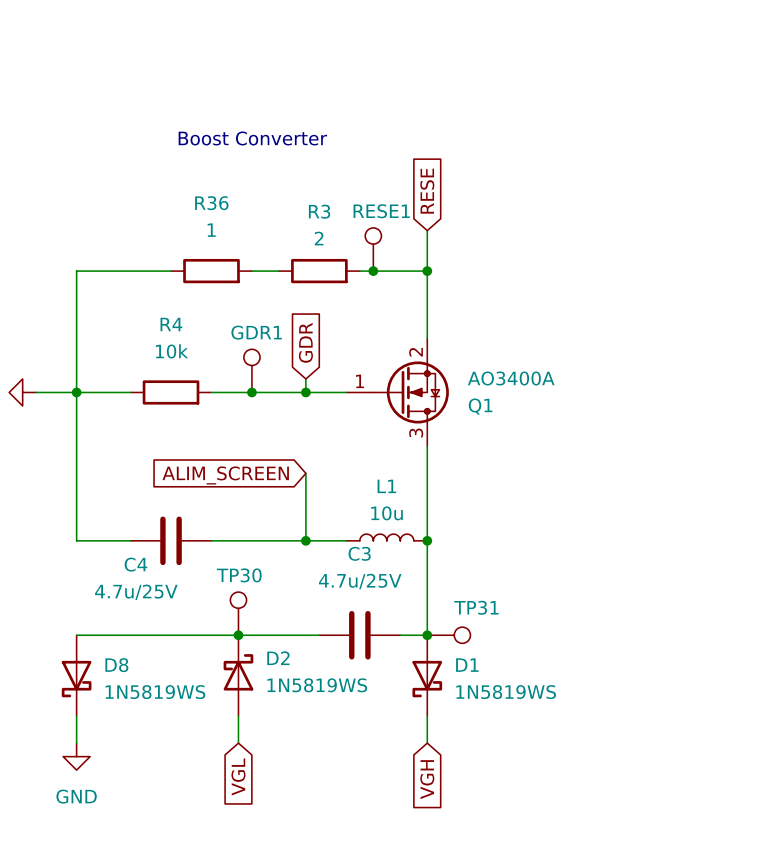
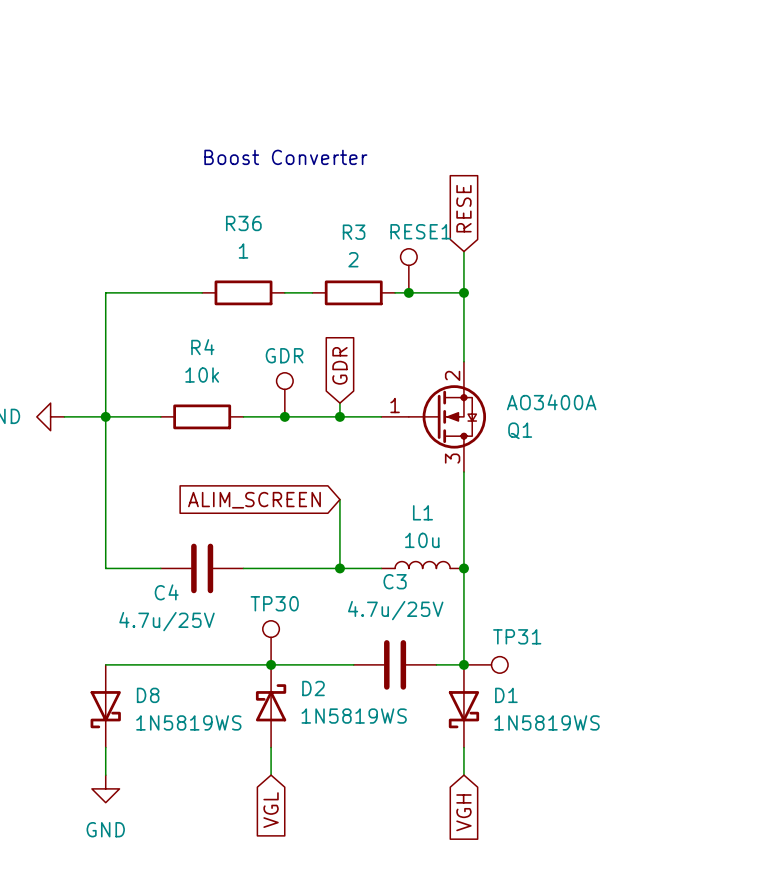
GDR1 name: GDR1 (256, 332) -> GDR (284, 355)

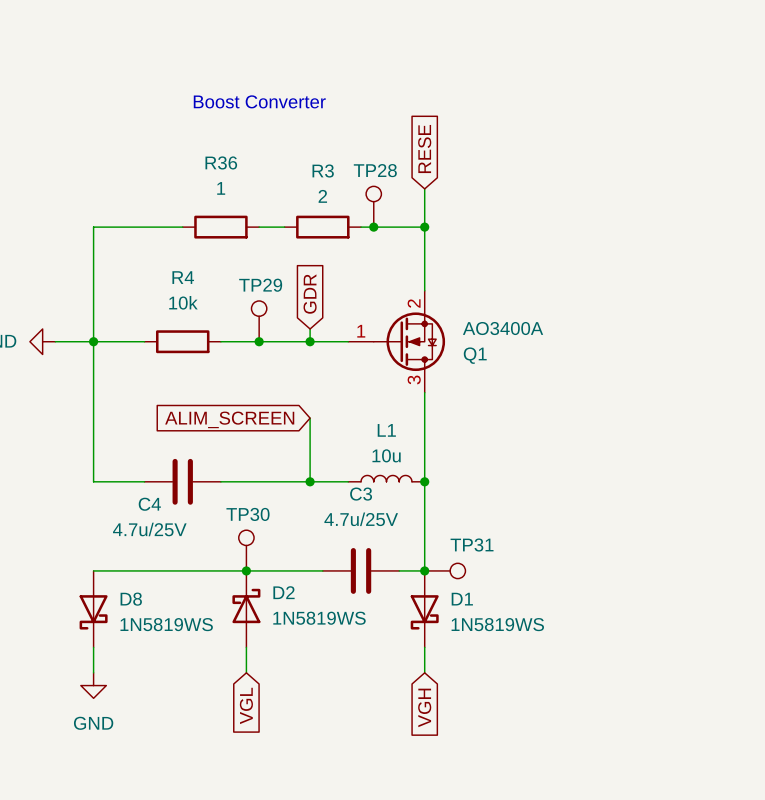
RESE1 name: RESE1 (420, 231) -> TP28 (375, 170)
GDR name: GDR (284, 355) -> TP29 (260, 285)

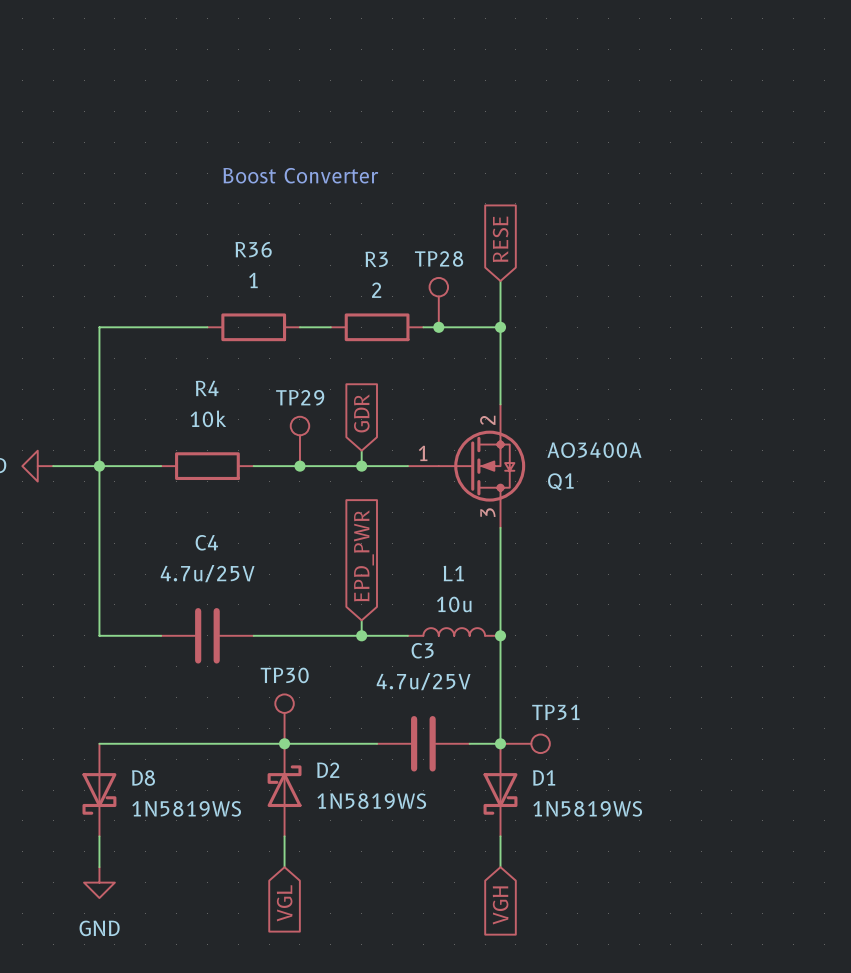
global label: none -> EPD_PWR (363, 555)
wire: (310, 418) (310, 469) -> none
global label: ALIM_SCREEN (229, 419) -> none
C4 name position: C4 (149, 504) -> C4 (206, 542)
C4 value position: 4.7u/25V (149, 529) -> 4.7u/25V (207, 573)

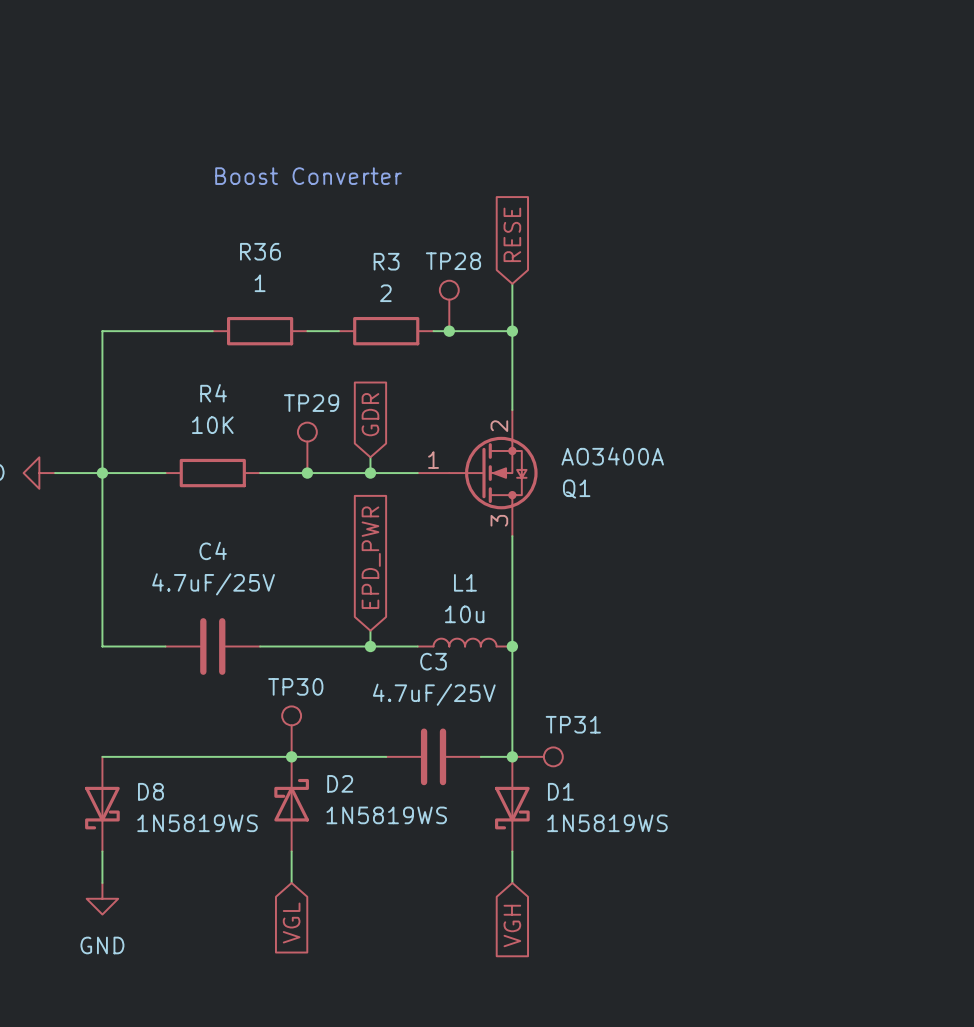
R4 value: 10k (208, 418) -> 10K (212, 425)
C4 value: 4.7u/25V (207, 573) -> 4.7uF/25V (213, 584)
C3 value: 4.7u/25V (423, 681) -> 4.7uF/25V (434, 694)

